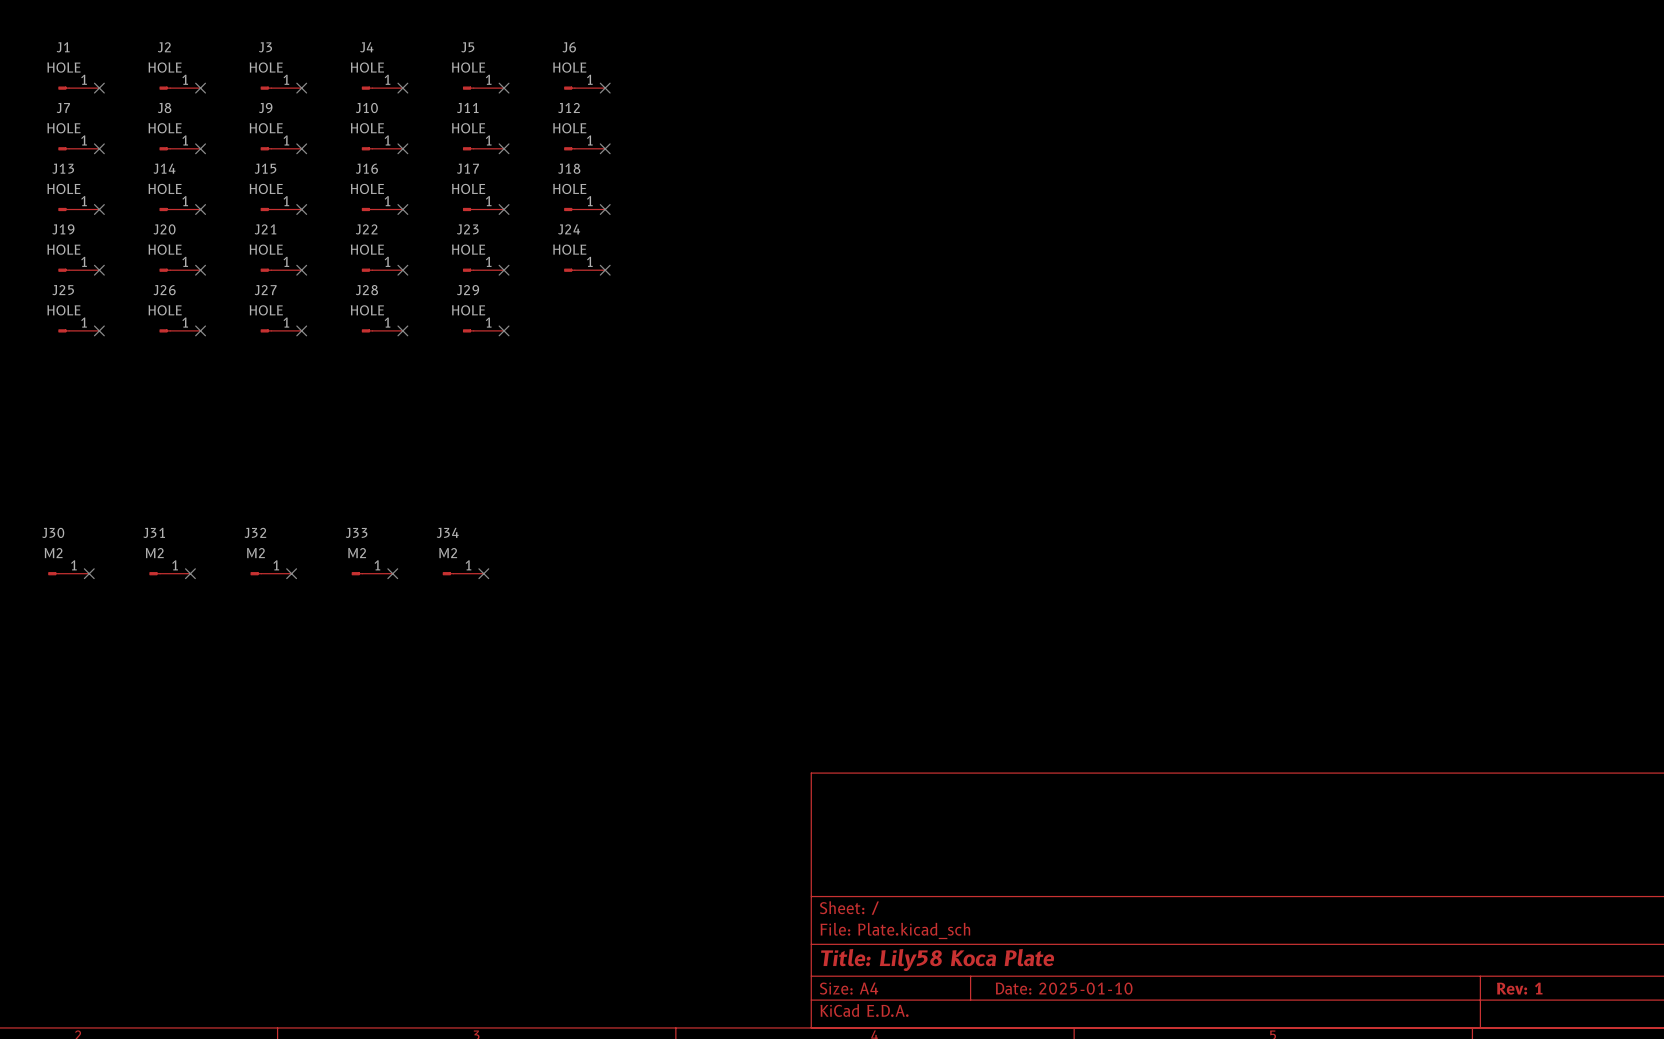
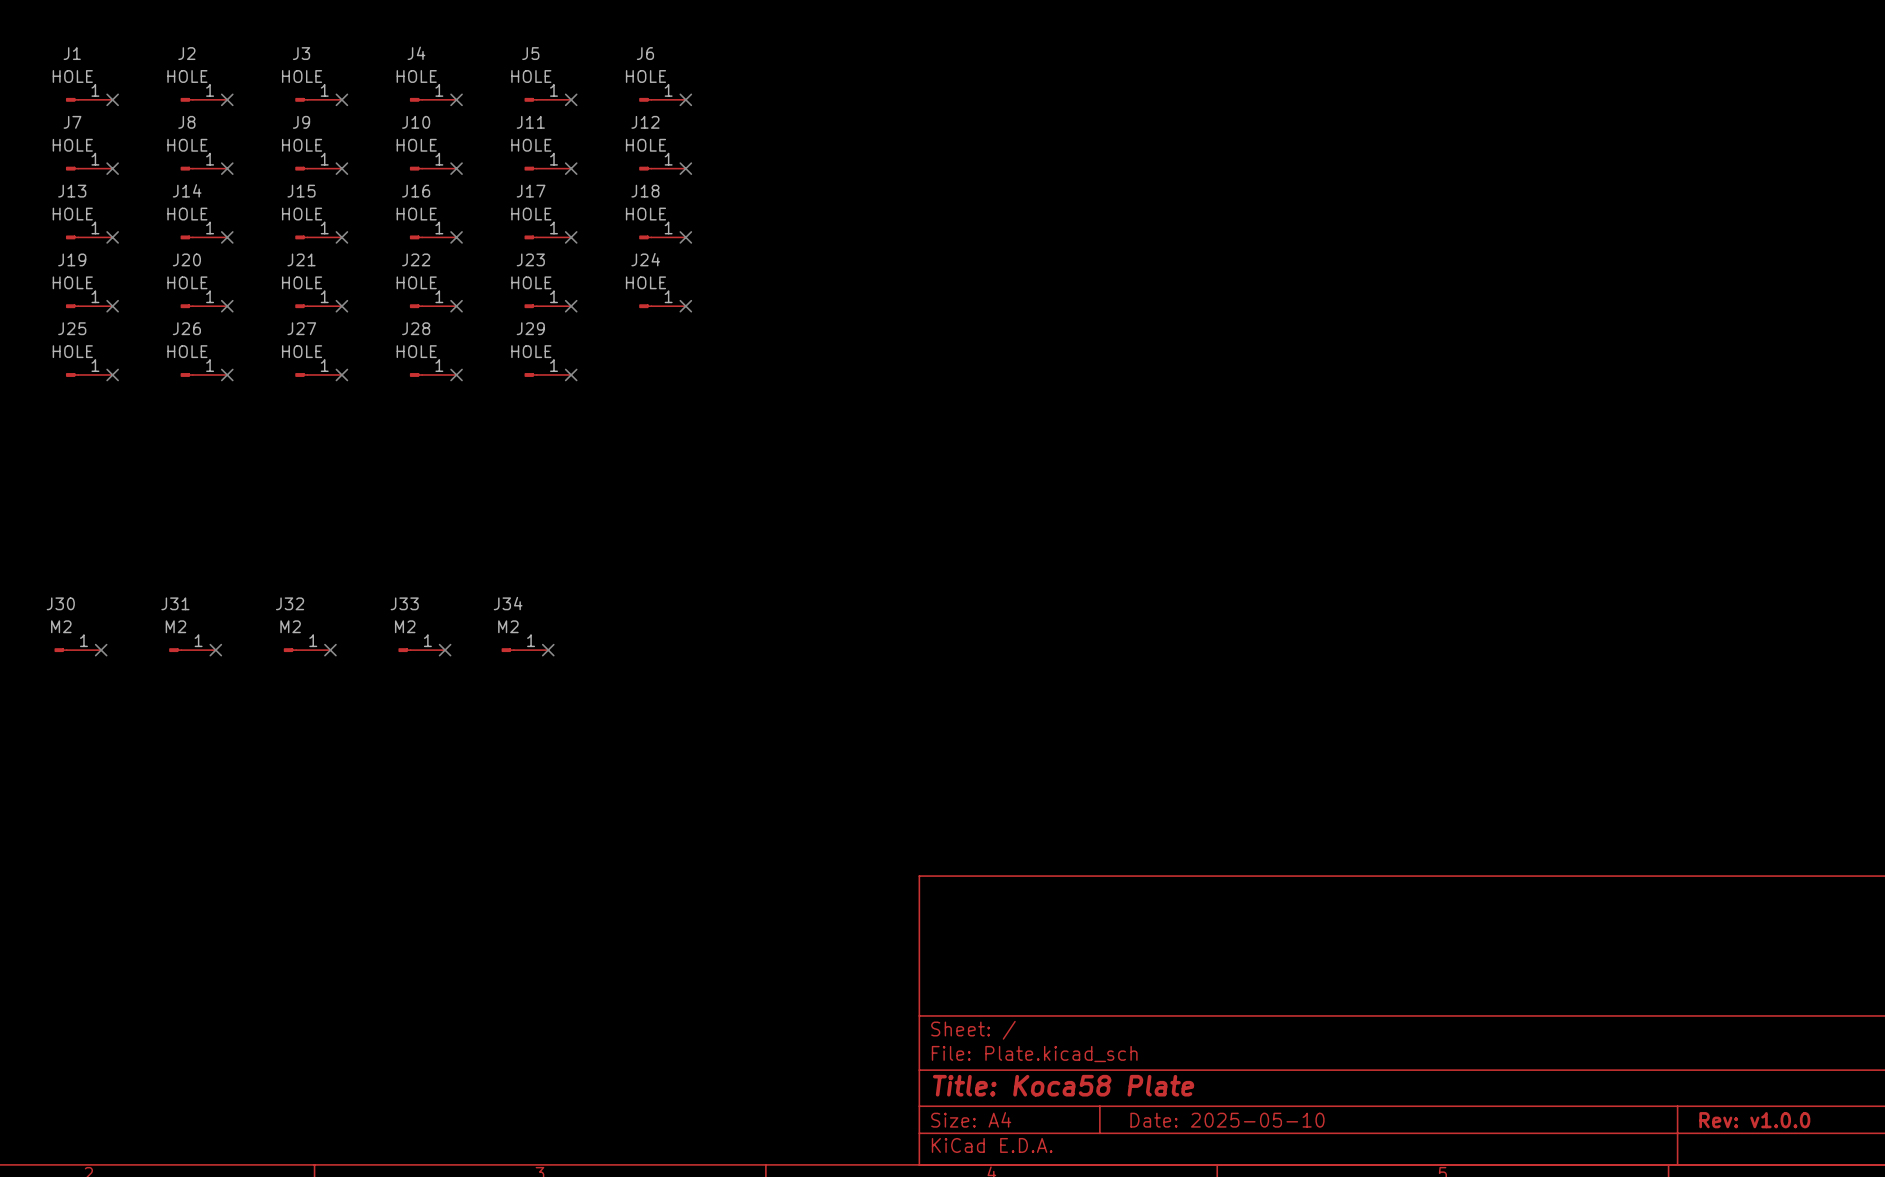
title block: Title: Lily58 Koca Plate (937, 960) -> Title: Koca58 Plate (1063, 1085)
title block: Date: 2025-01-10 (1064, 988) -> Date: 2025-05-10 (1227, 1120)
title block: Rev: 1 (1519, 988) -> Rev: v1.0.0 (1754, 1120)

